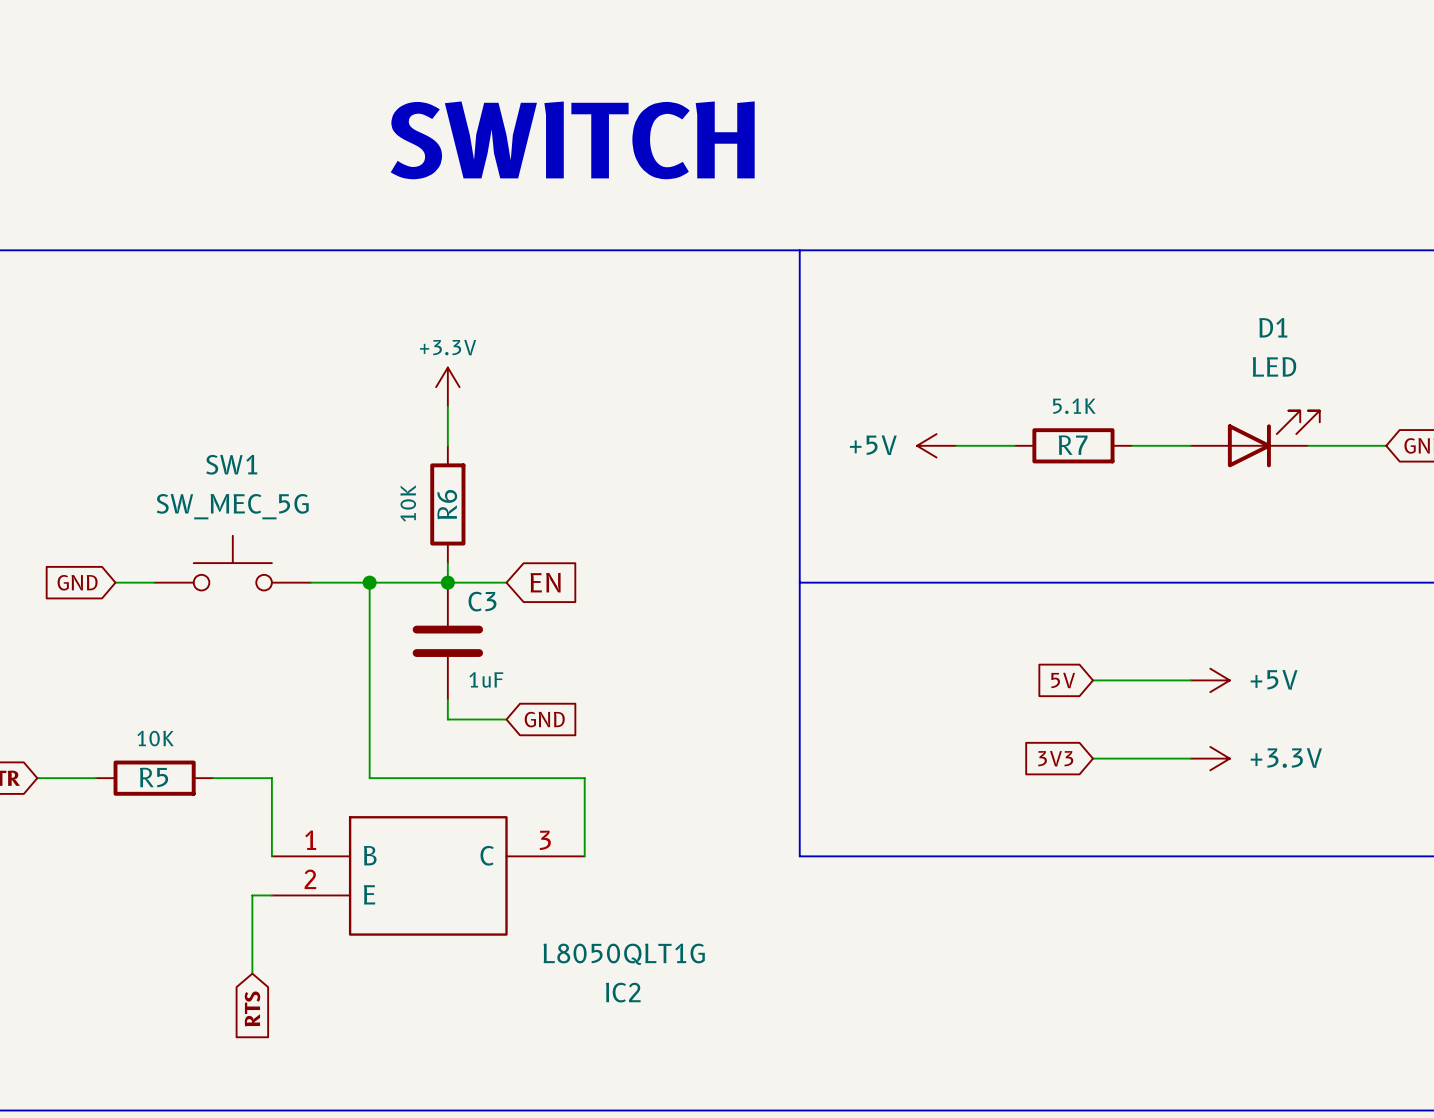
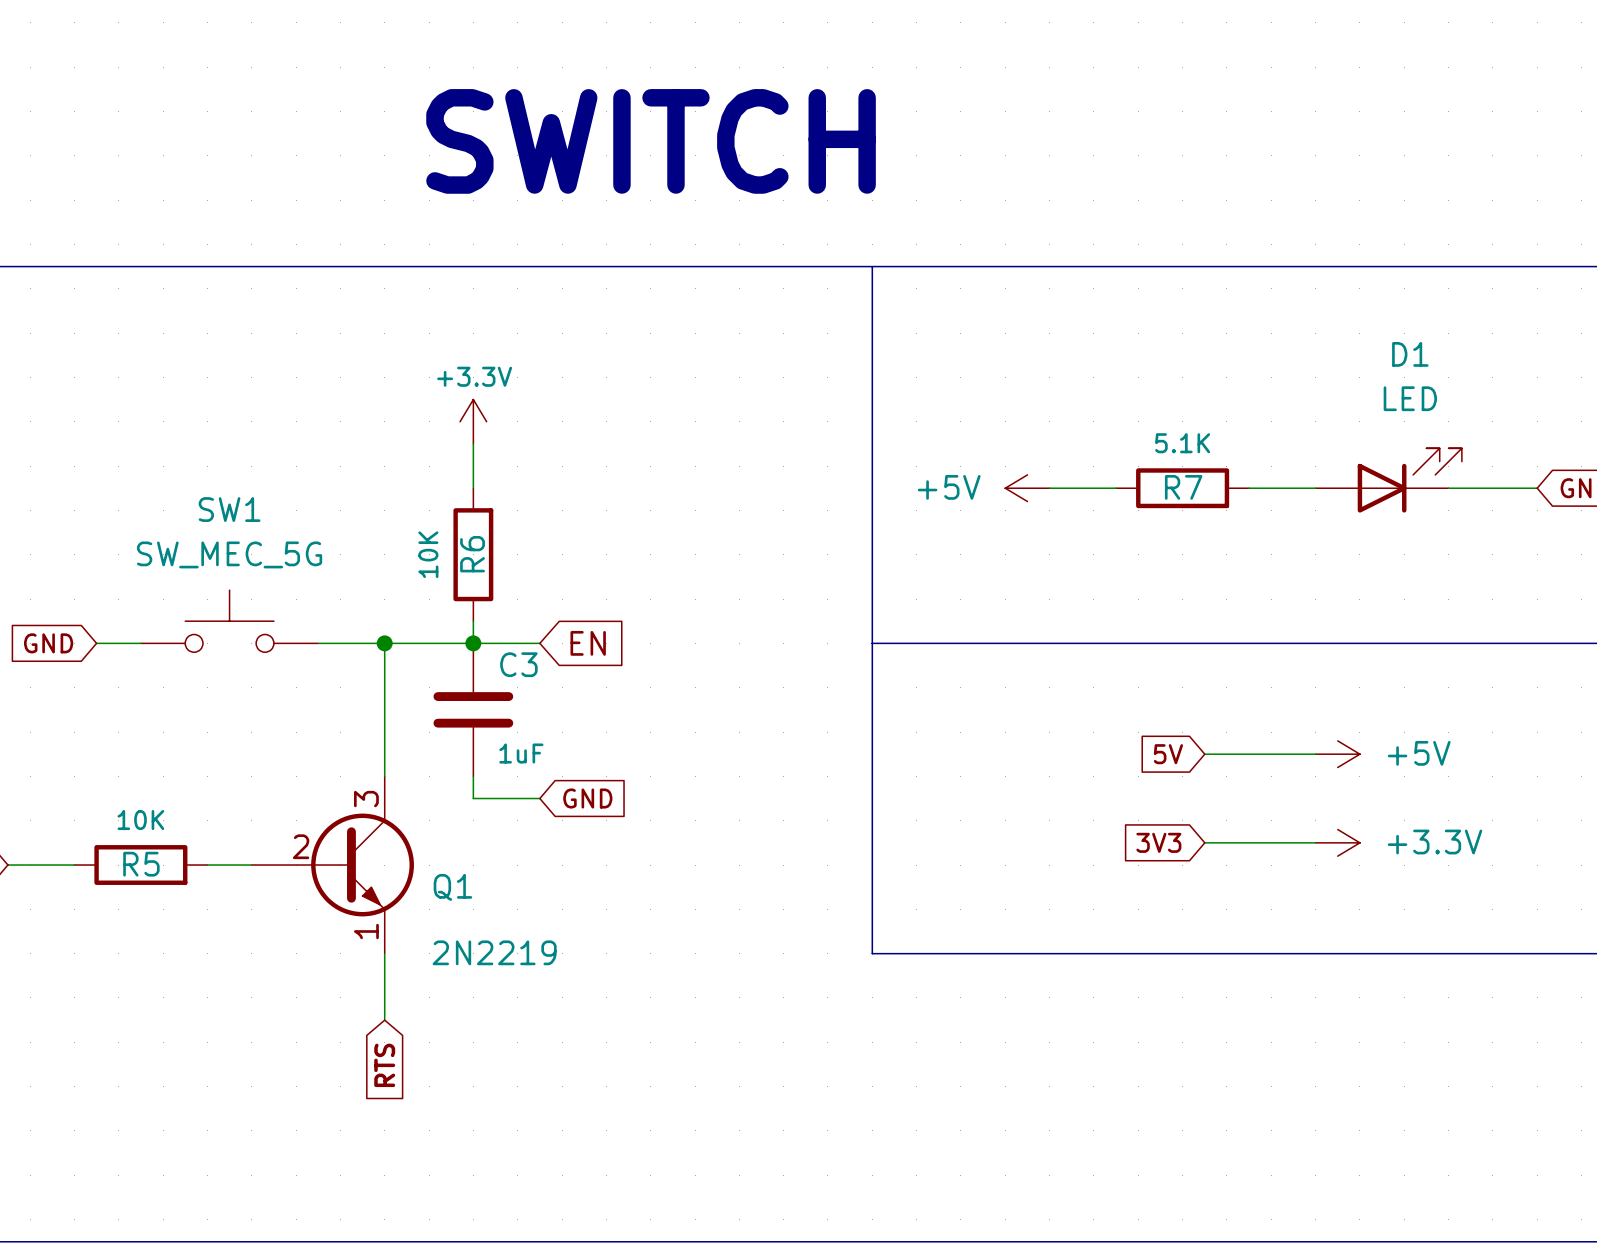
wire: (369, 699) (369, 778) (584, 778) (584, 856) -> none
wire: (252, 778) (271, 778) (271, 856) -> none
Q1: none -> 2N2219 (332, 865)
wire: none -> (384, 953) (384, 1020)
IC2: L8050QLT1G (428, 875) -> none
wire: (271, 895) (252, 895) (252, 973) -> none
global label position: RTS (252, 1008) -> RTS (384, 1065)

